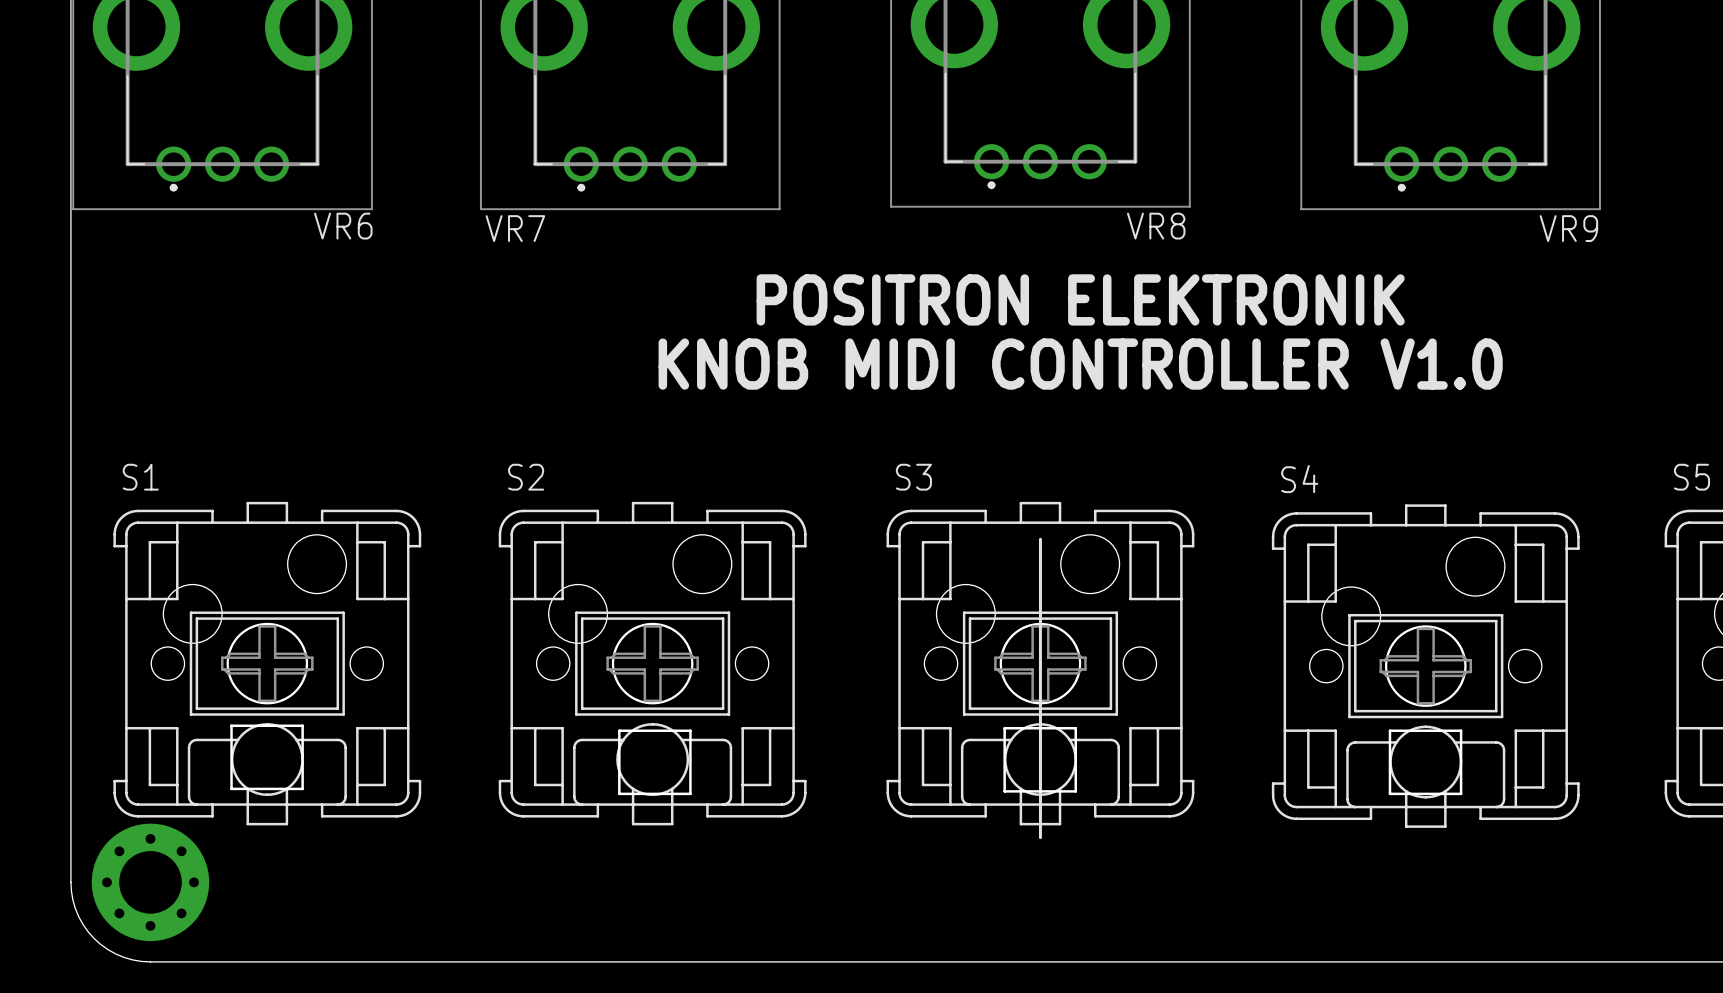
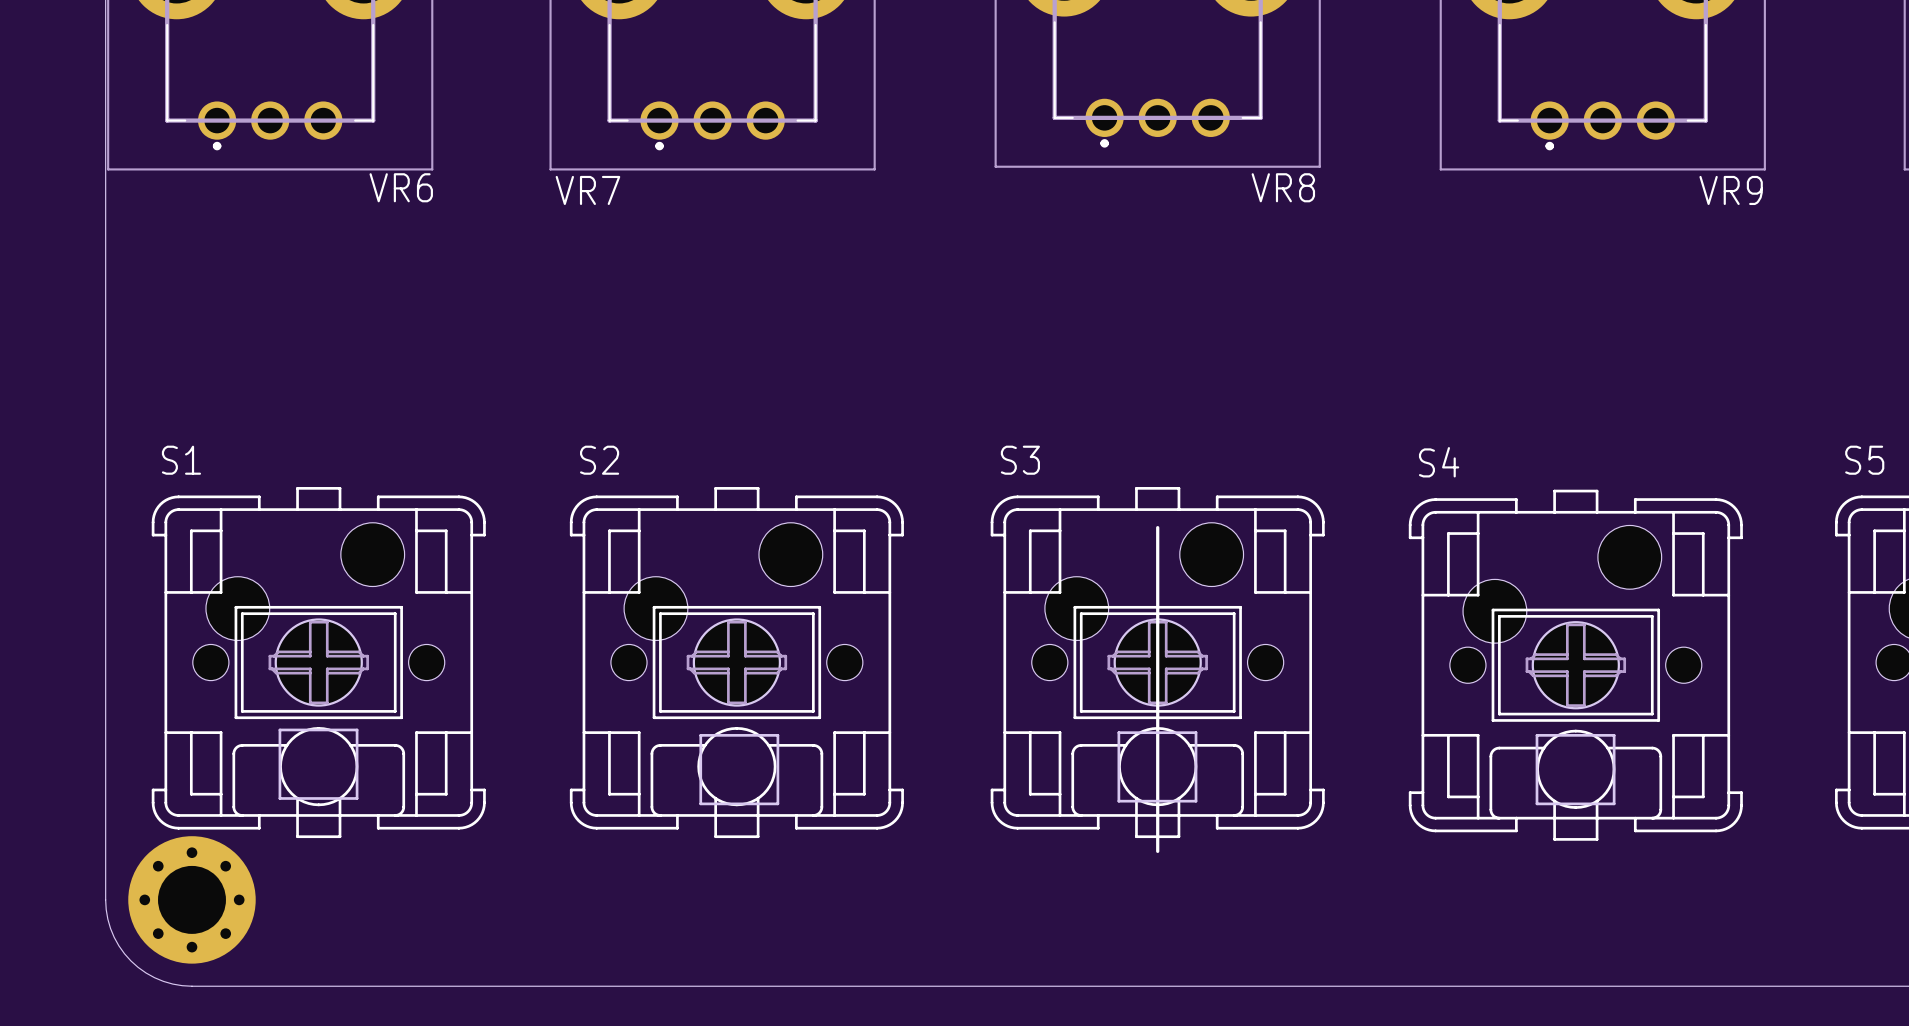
text: POSITRON ELEKTRONIK (1080, 299) -> none
text: KNOB MIDI CONTROLLER V1.0 (1080, 364) -> none

